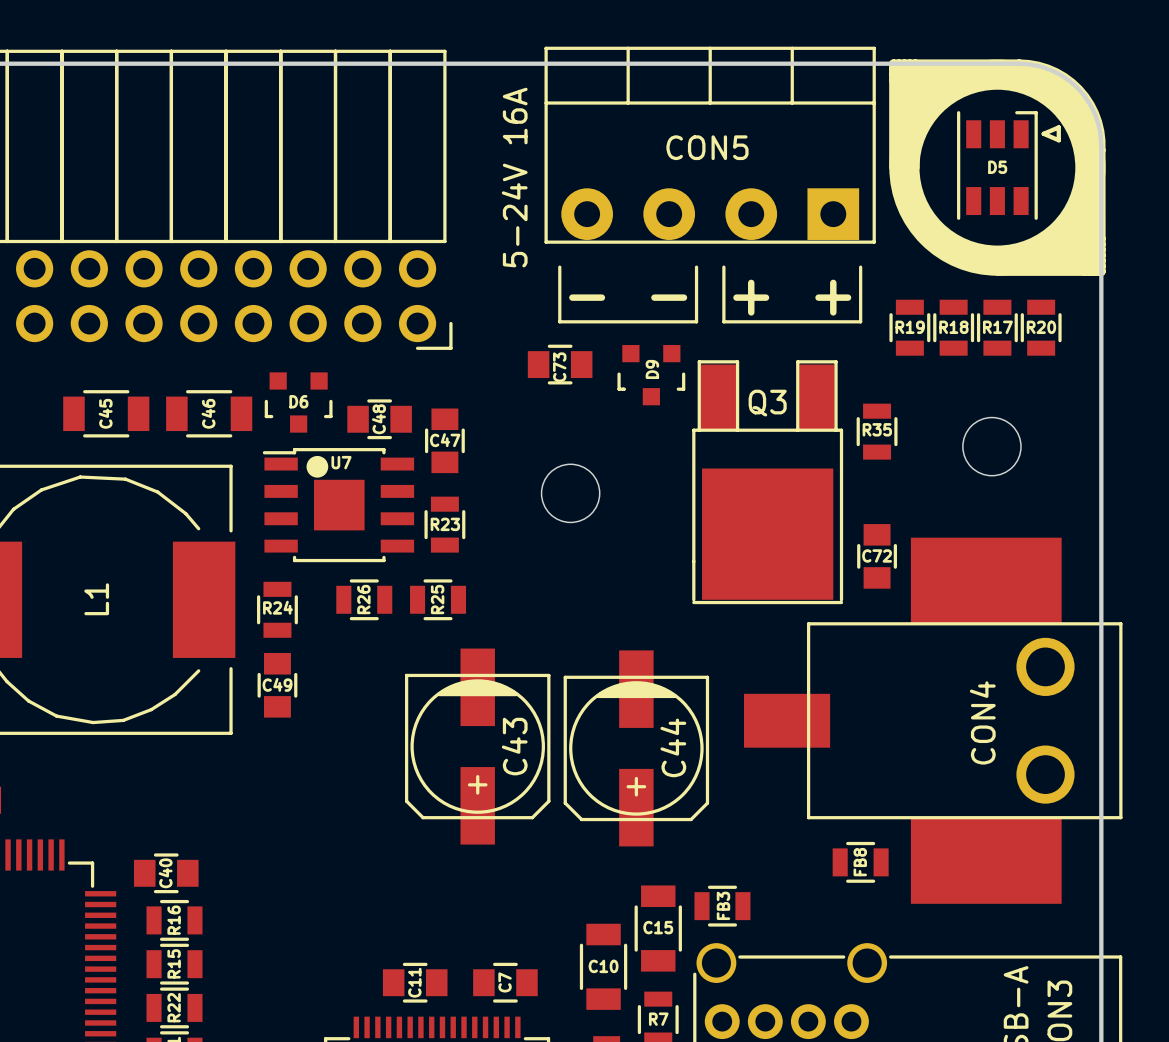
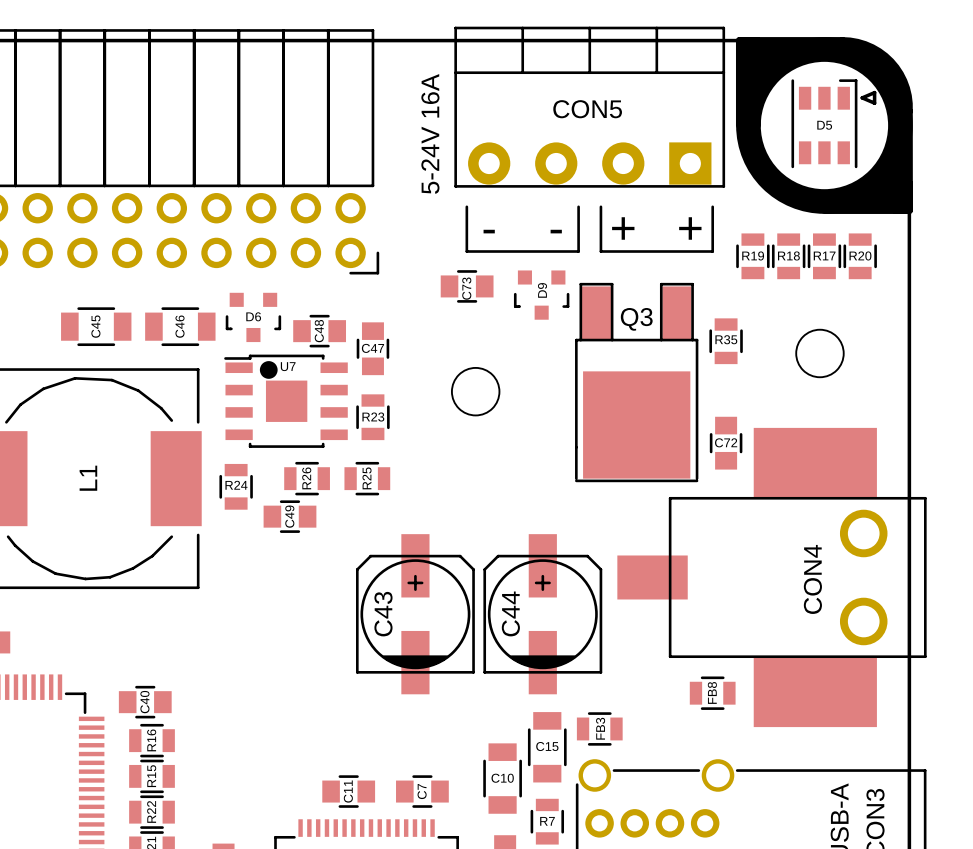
C49 rotation: 0° (277, 685) -> 90° clockwise (289, 516)
C49 position: (277, 685) -> (289, 516)
C43 rotation: 0° (477, 746) -> 180° (415, 614)
C44 rotation: 0° (636, 748) -> 180° (542, 614)

